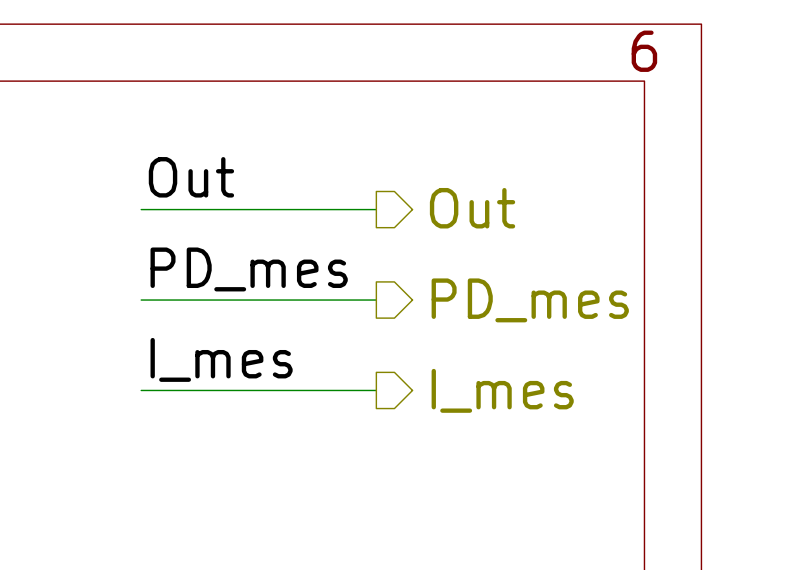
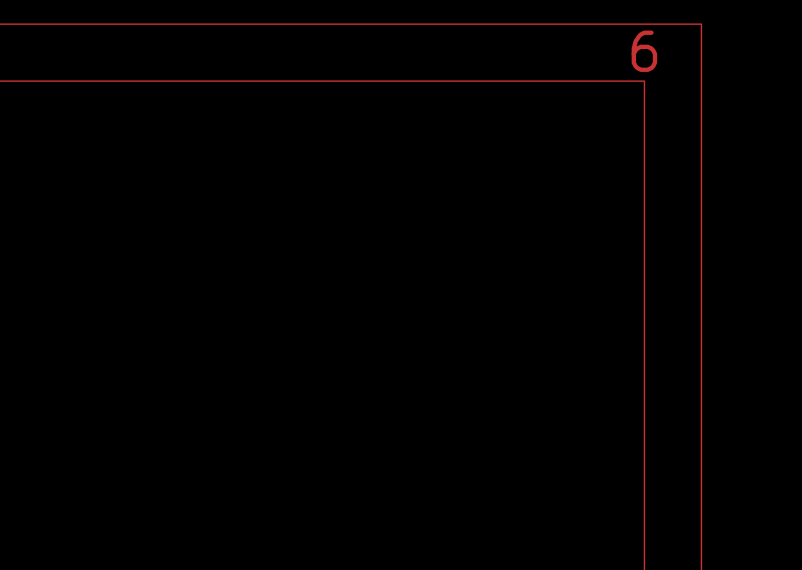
label: Out (191, 177) -> none
hierarchical label: Out (472, 208) -> none
wire: (141, 209) (376, 209) -> none
label: PD_mes (249, 269) -> none
wire: (141, 300) (376, 300) -> none
hierarchical label: PD_mes (530, 300) -> none
label: I_mes (221, 359) -> none
wire: (141, 390) (376, 390) -> none
hierarchical label: I_mes (502, 390) -> none

